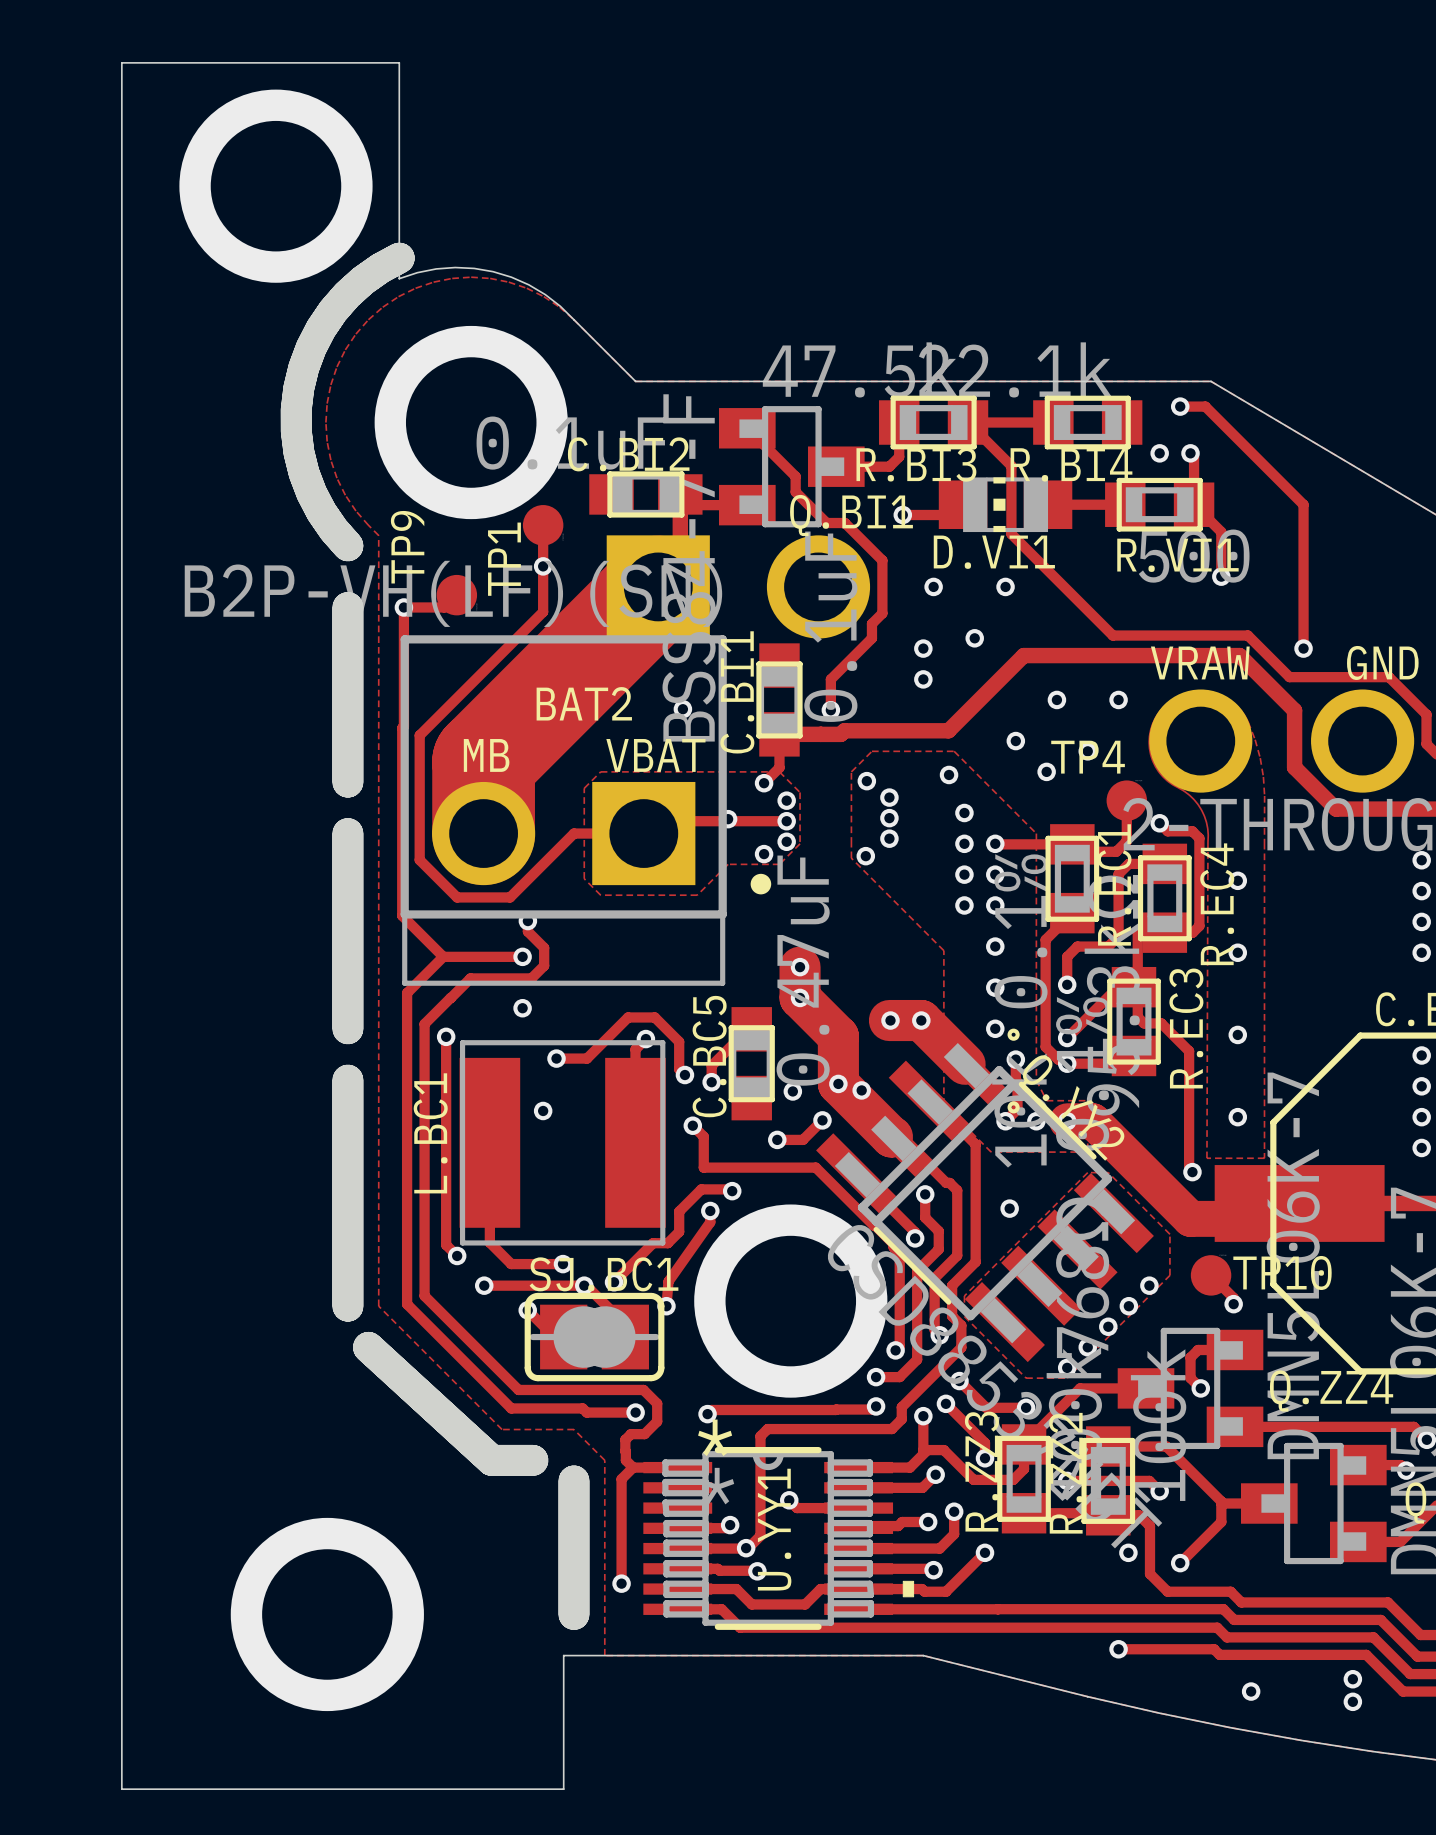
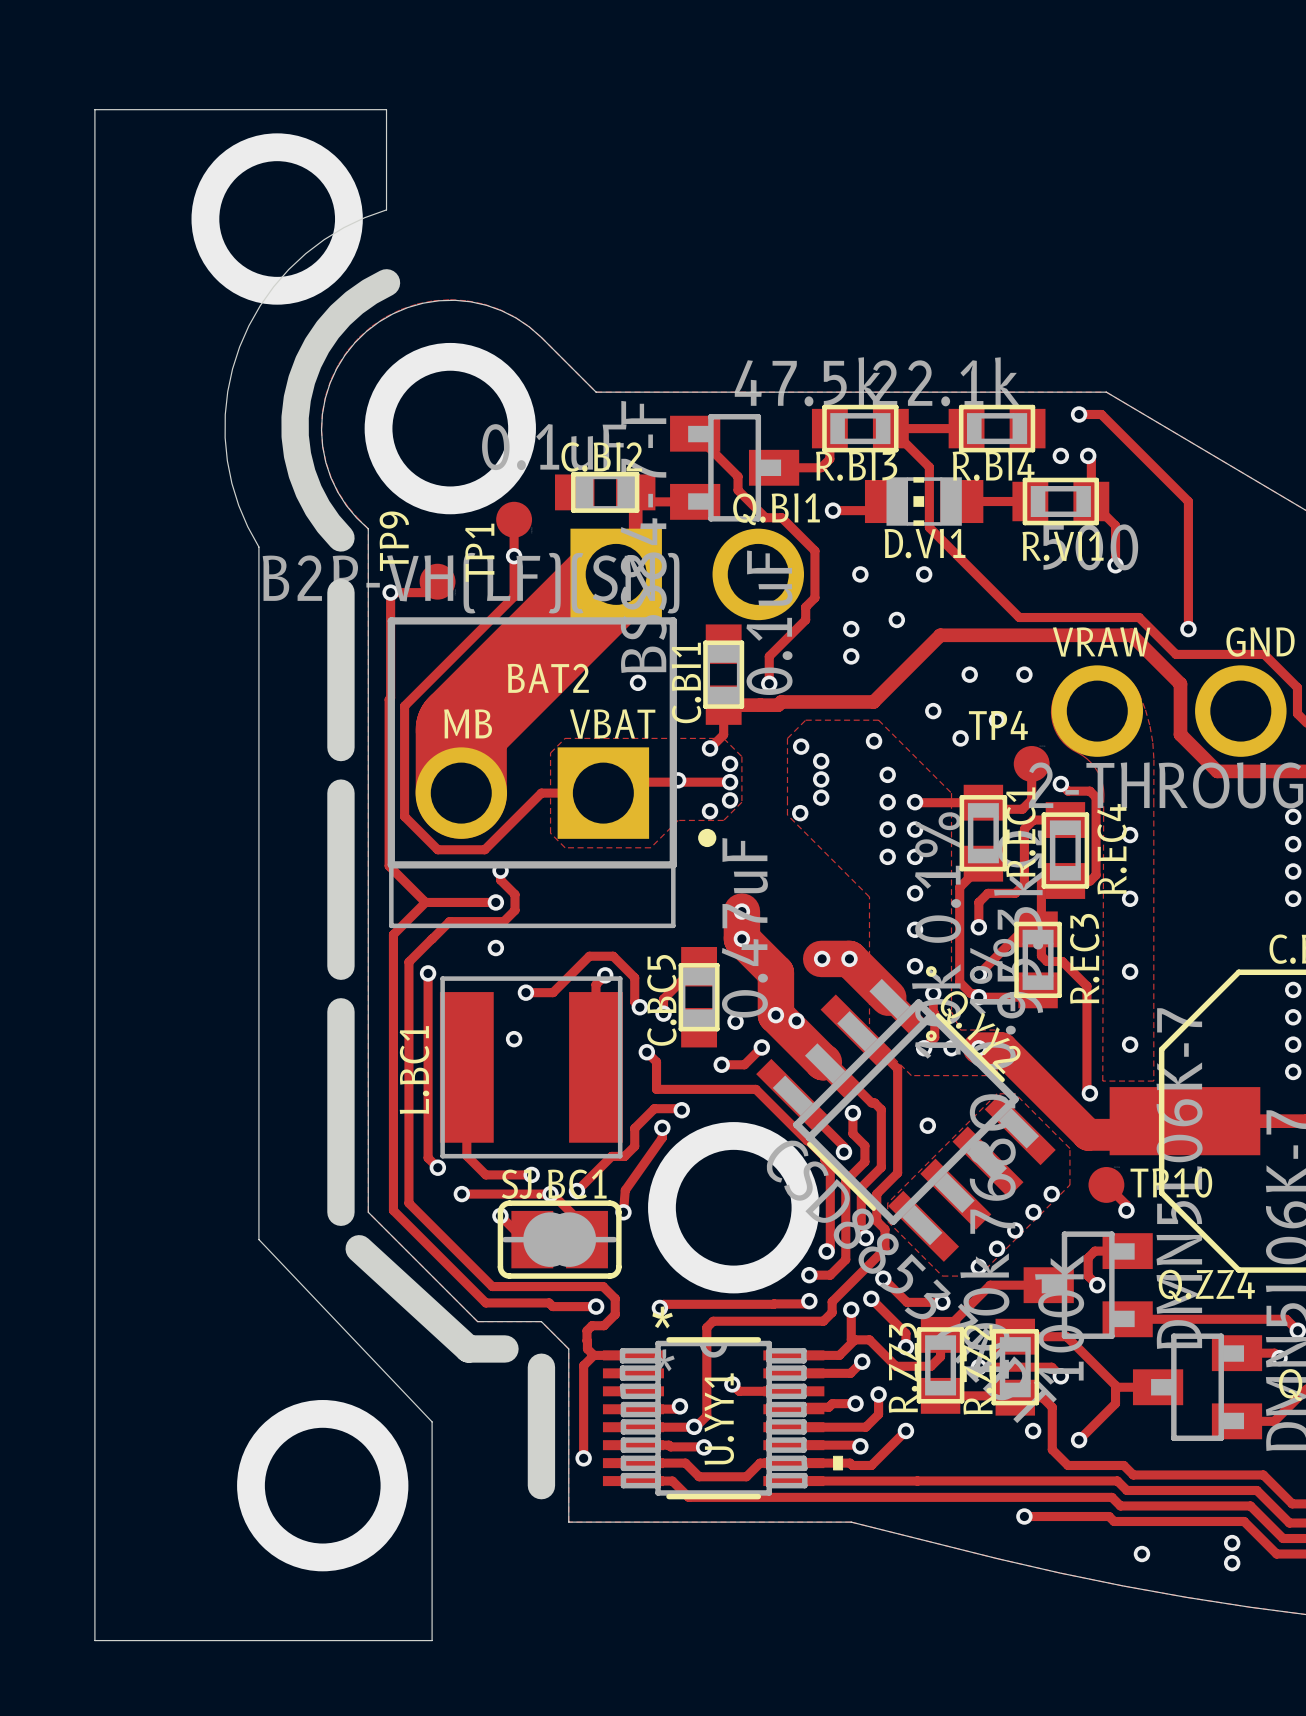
board edge: (121, 62) (121, 1789) -> (140, 109) (94, 109) (94, 1640) (140, 1640)
board edge: (399, 175) (399, 278) (436, 268) (455, 267) (493, 271) (528, 284) (545, 294) (573, 319) -> (386, 209) (364, 217) (324, 239) (305, 253) (273, 286) (248, 325) (239, 347) (227, 391) (225, 437) (231, 483) (247, 526) (258, 547) (258, 1239) (432, 1421) (432, 1640)
board edge: (604, 1655) (563, 1655) (563, 1789) (450, 1789) -> (568, 1522) (568, 1348) (541, 1321) (477, 1321) (368, 1212) (368, 528) (356, 517) (337, 492) (325, 462) (321, 430) (325, 398) (336, 368) (344, 355) (354, 342) (379, 321) (407, 307) (439, 300) (455, 300) (486, 305) (516, 317) (541, 337)

